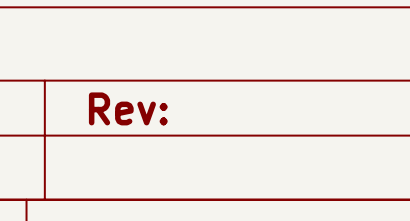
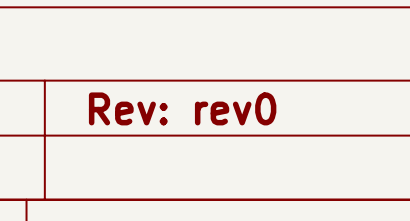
title block: Rev: (128, 108) -> Rev: rev0 (182, 108)

